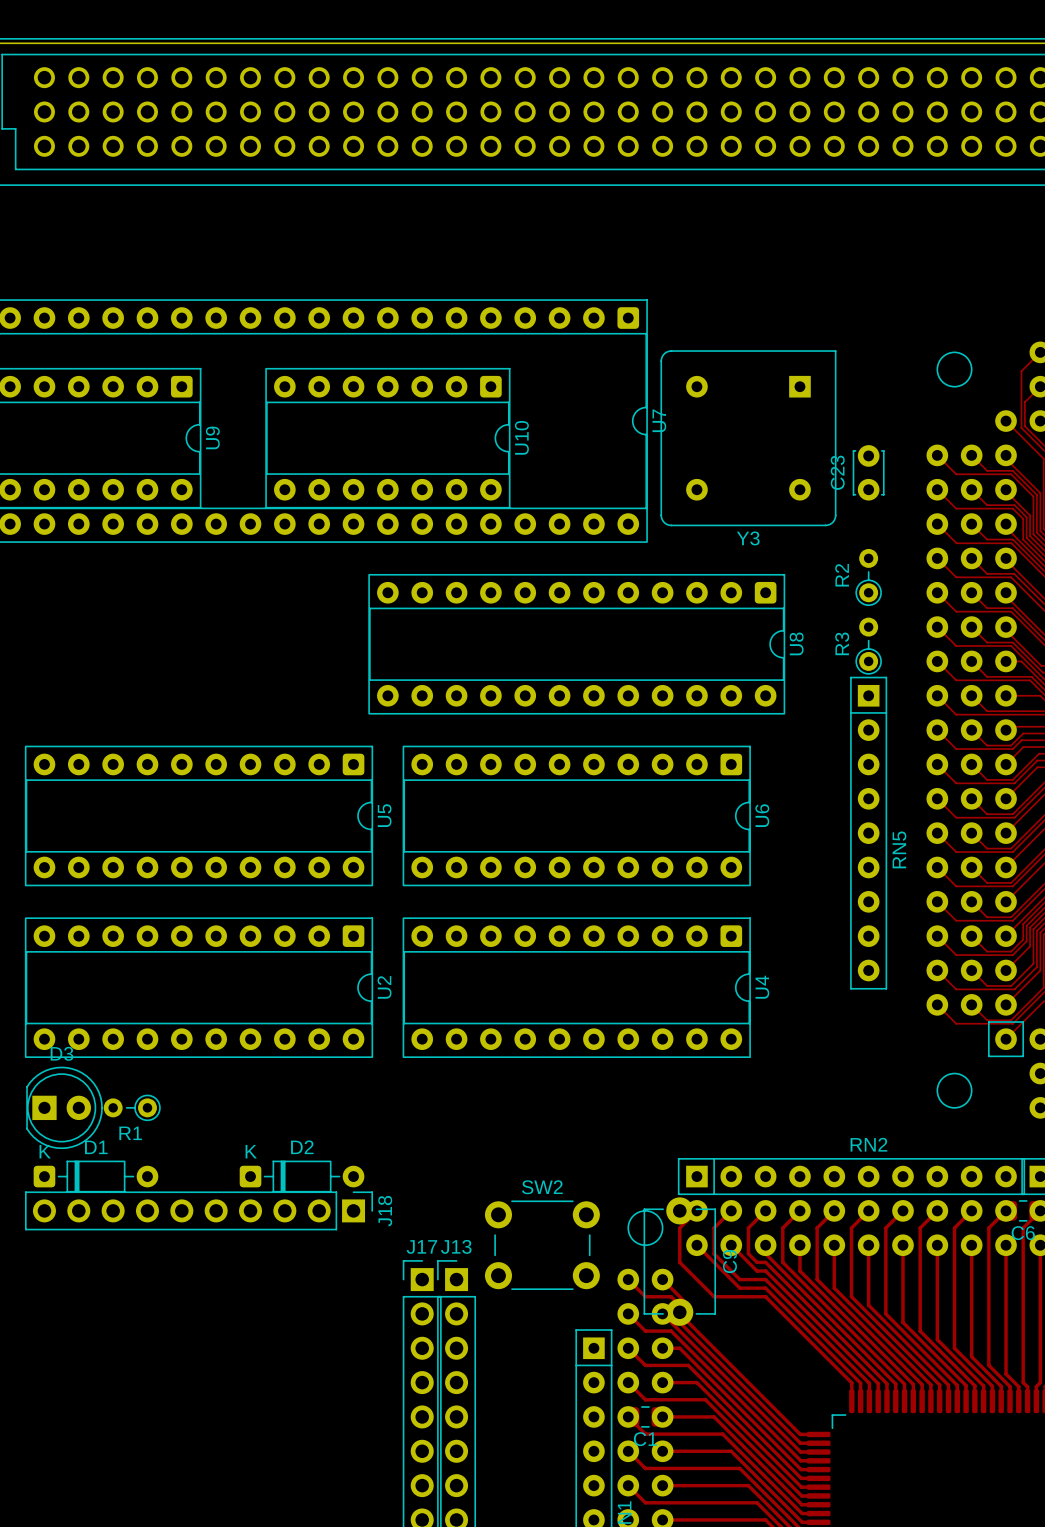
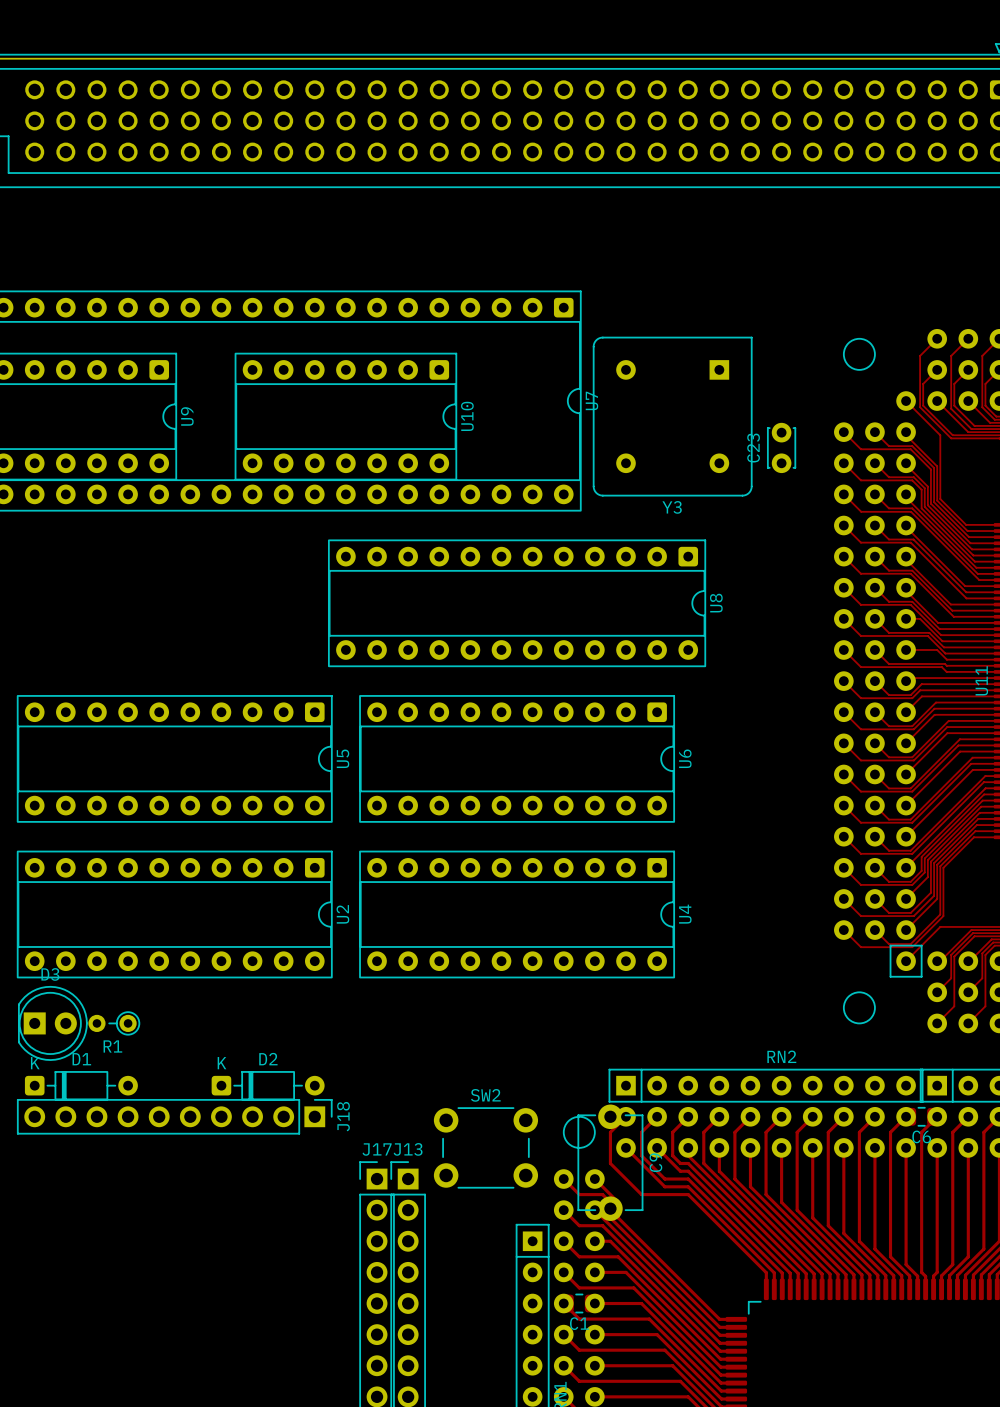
R2: (868, 577) -> none
R3: (868, 646) -> none
RN5: (868, 833) -> none

